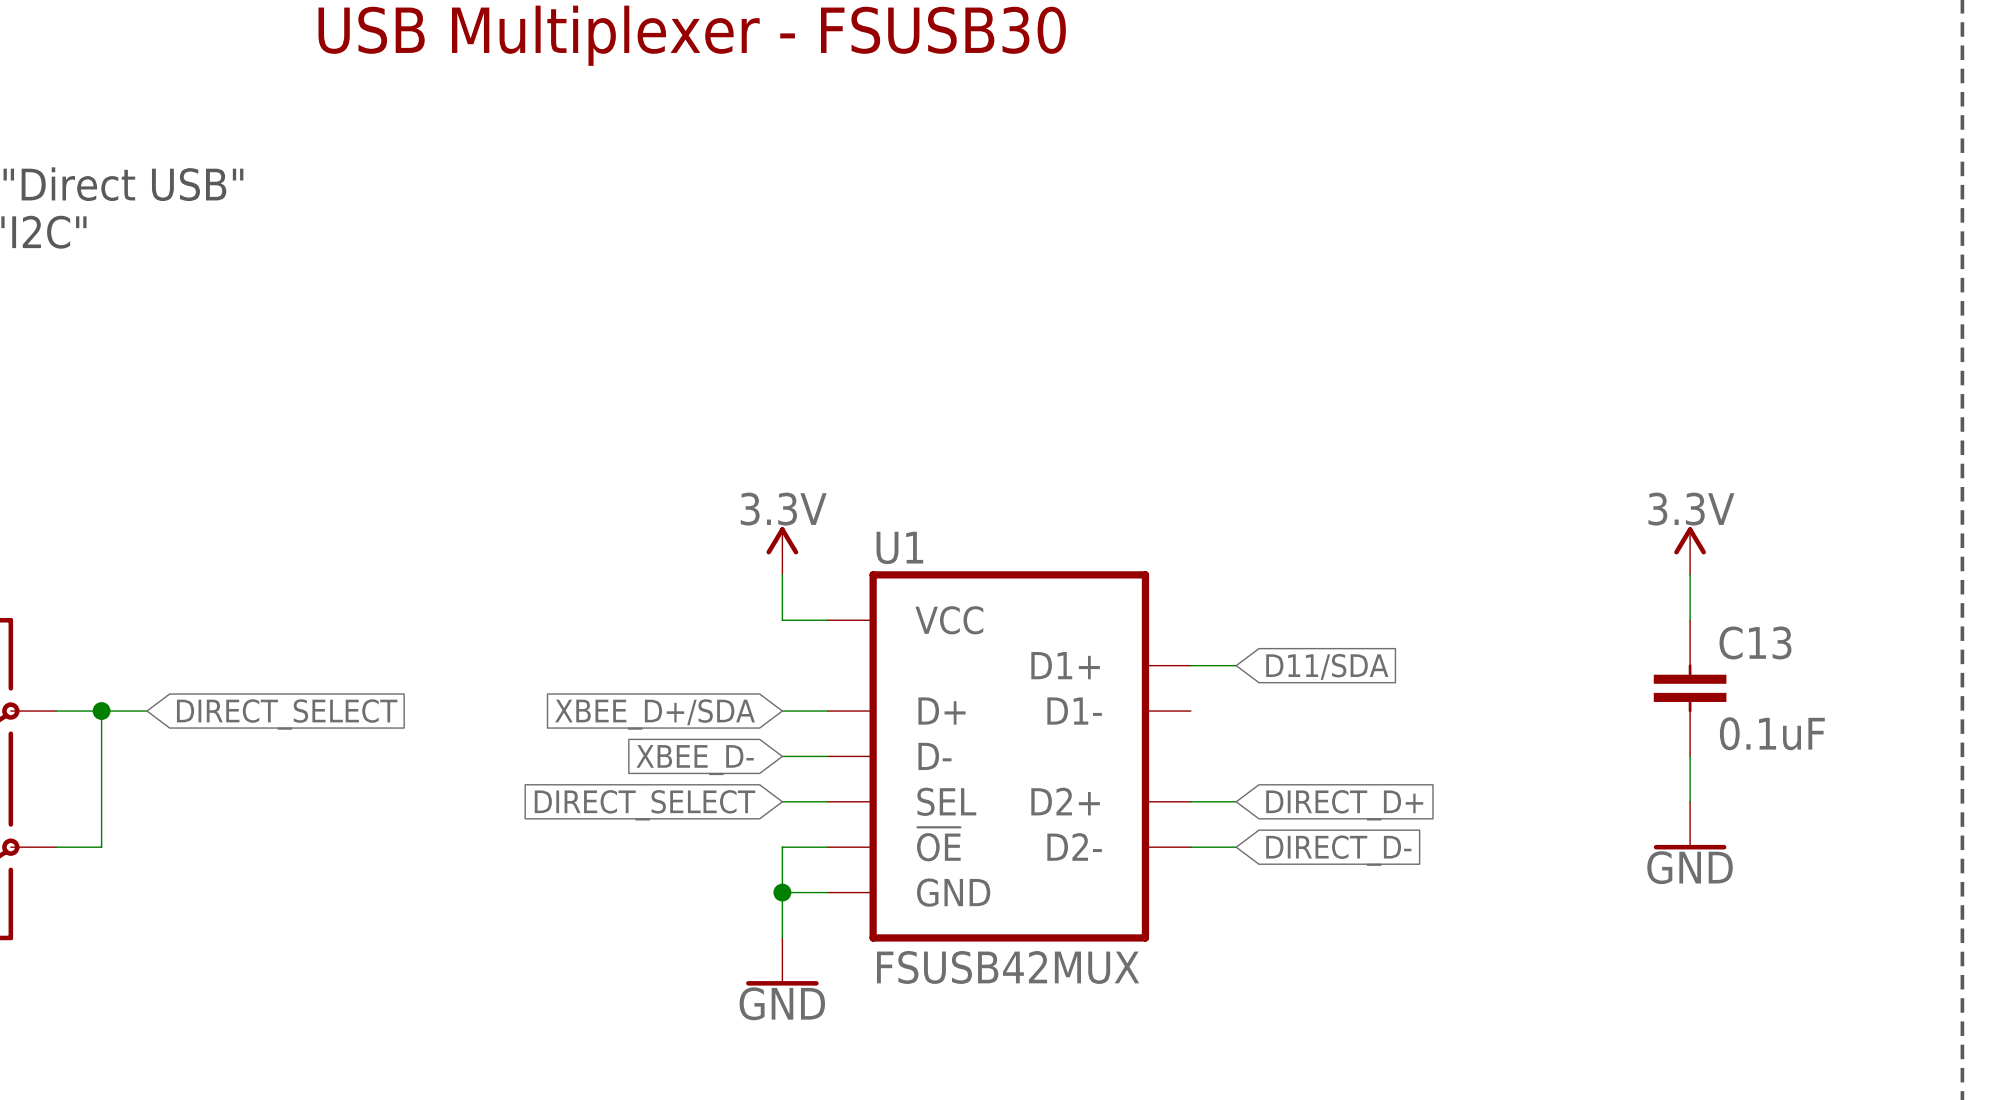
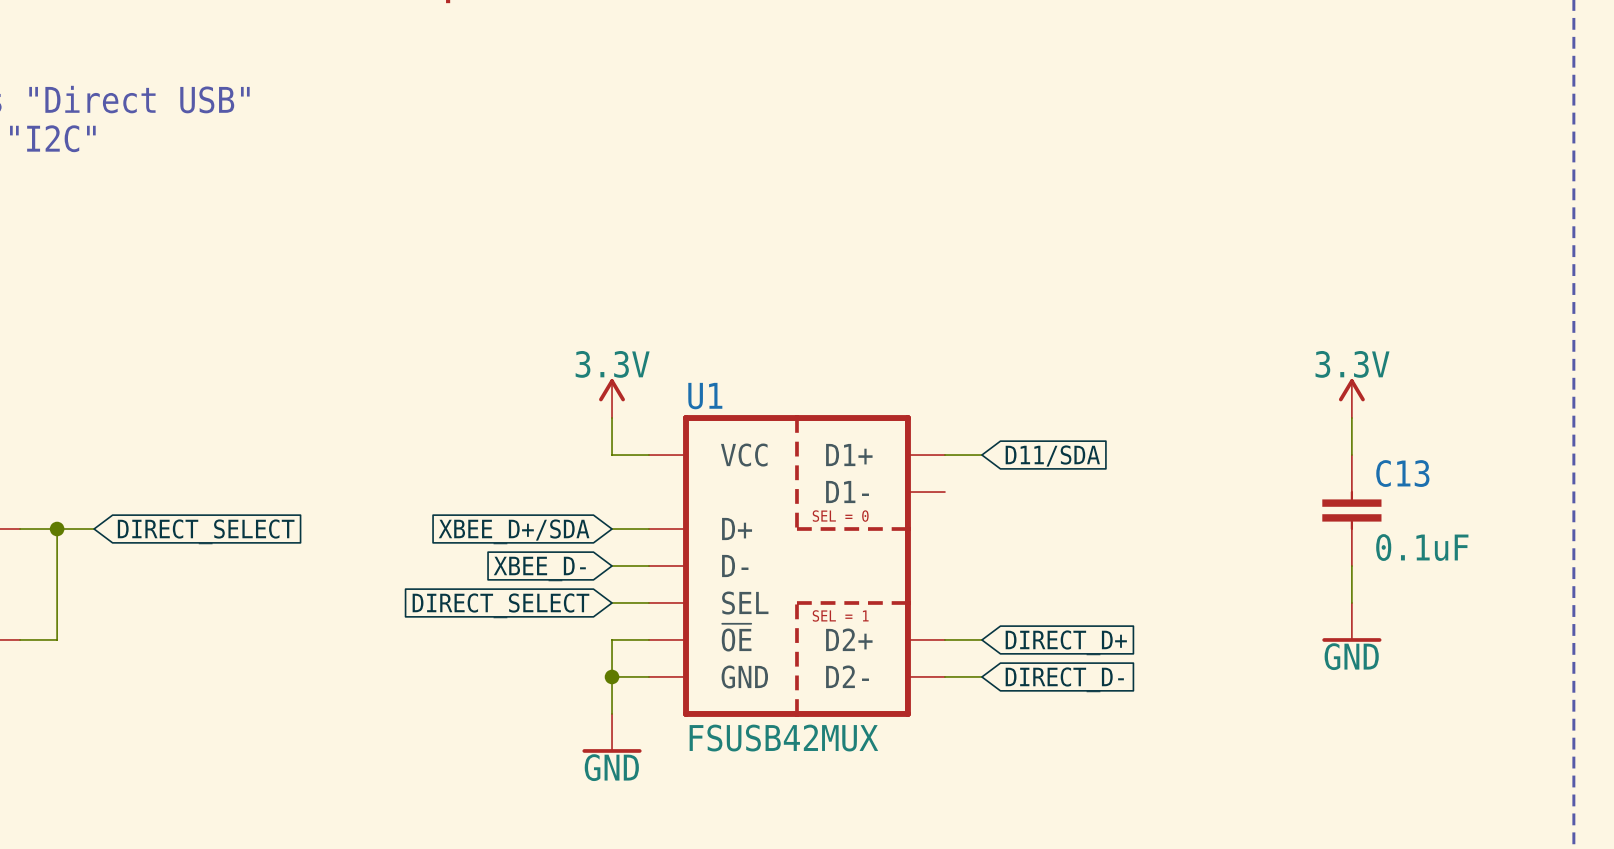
U1 symbol: [827, 571, 1191, 942] -> [649, 415, 945, 717]
wire: (1190, 665) (1236, 665) -> (944, 455) (981, 455)
global label position: D11/SDA (1327, 666) -> D11/SDA (1052, 456)
wire: (1190, 801) (1236, 801) -> (944, 676) (981, 676)
global label: DIRECT_D+ (1344, 805) -> none
global label: DIRECT_D- (1338, 850) -> DIRECT_D+ (1066, 642)
global label: none -> DIRECT_D- (1064, 679)

